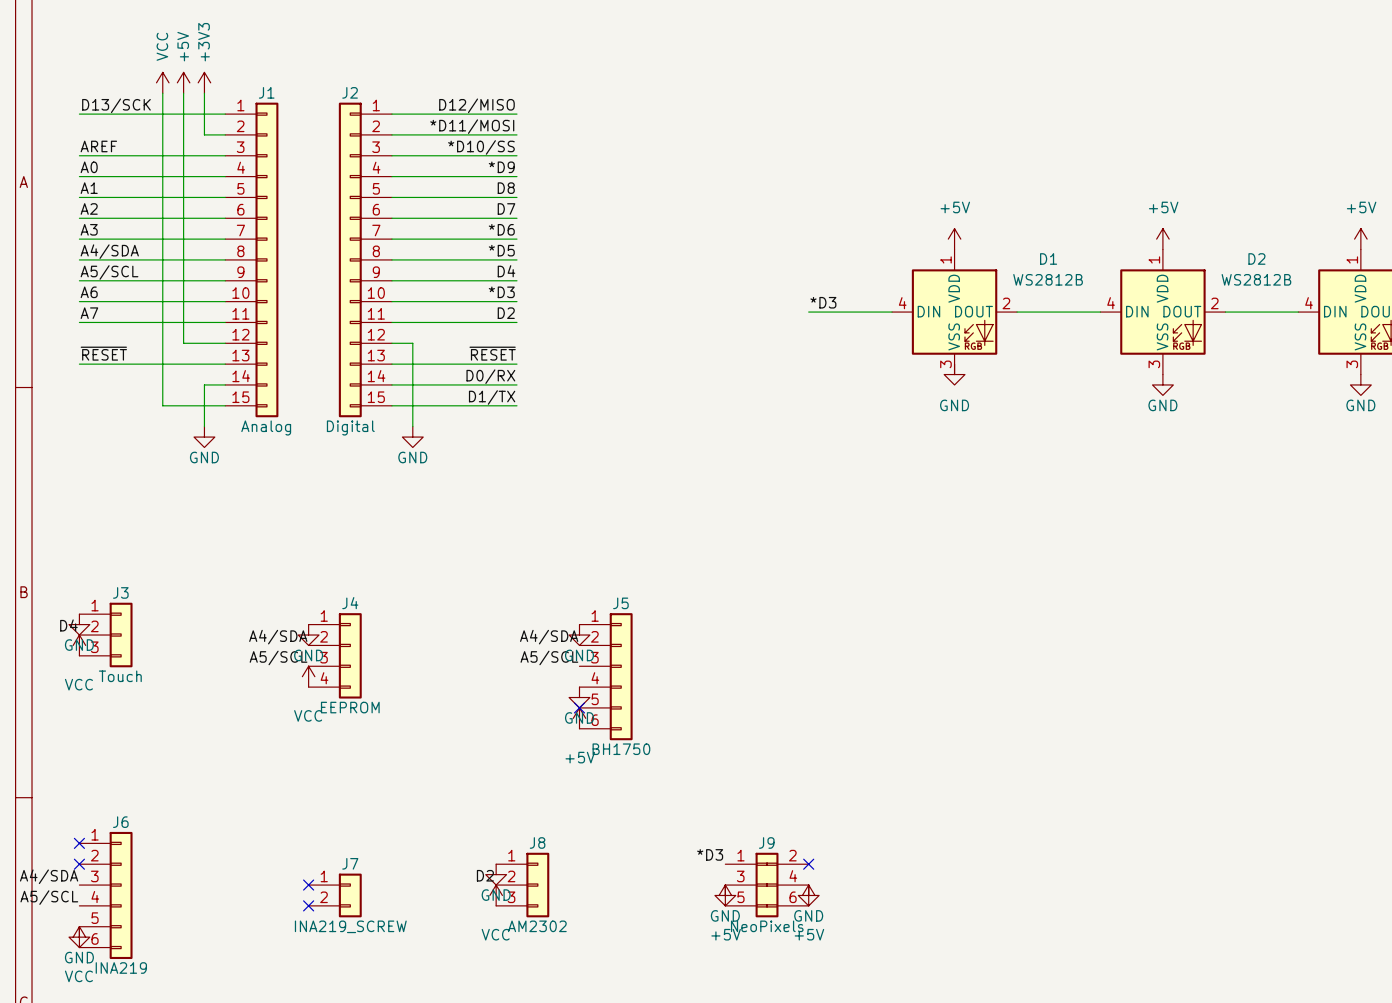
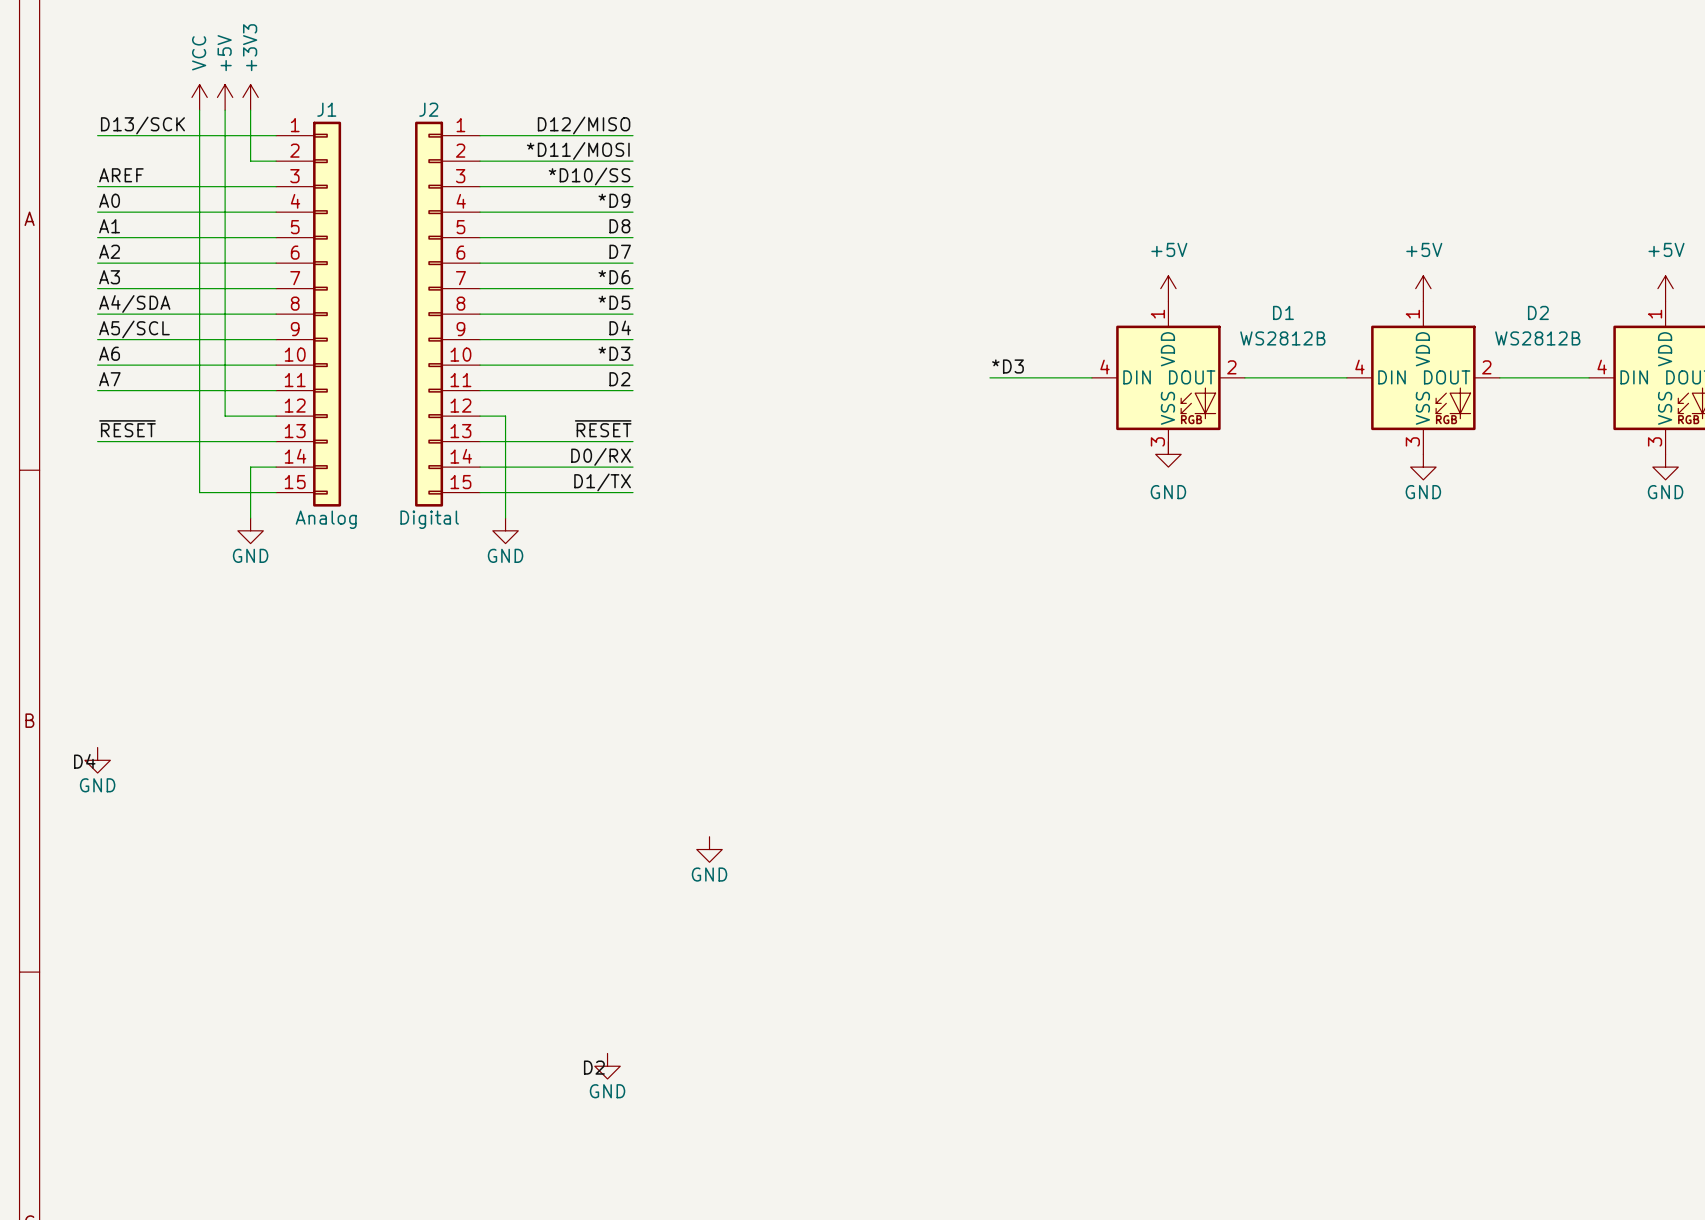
J3: Touch (105, 635) -> none
power symbol: GND (308, 635) -> none
power symbol: GND (579, 635) -> none
label: A4/SDA (278, 637) -> none
label: A4/SDA (549, 637) -> none
power symbol: VCC (79, 645) -> none
J4: EEPROM (335, 655) -> none
label: A5/SCL (278, 657) -> none
label: A5/SCL (549, 657) -> none
power symbol: VCC (308, 676) -> none
J5: BH1750 (606, 676) -> none
no-connect mark: (579, 707) -> none
power symbol: +5V (579, 718) -> none
no-connect mark: (79, 843) -> none
label: *D3 (710, 854) -> none
no-connect mark: (79, 864) -> none
no-connect mark: (808, 864) -> none
label: A4/SDA (49, 876) -> none
no-connect mark: (308, 885) -> none
J8: AM2302 (522, 885) -> none
J9: NeoPixels (767, 885) -> none
J6: INA219 (105, 895) -> none
J7: INA219_SCREW (335, 895) -> none
power symbol: VCC (496, 895) -> none
power symbol: +5V (725, 895) -> none
power symbol: GND (725, 895) -> none
power symbol: +5V (808, 895) -> none
power symbol: GND (808, 895) -> none
label: A5/SCL (49, 897) -> none
no-connect mark: (308, 905) -> none
power symbol: VCC (79, 937) -> none
power symbol: GND (79, 937) -> none

